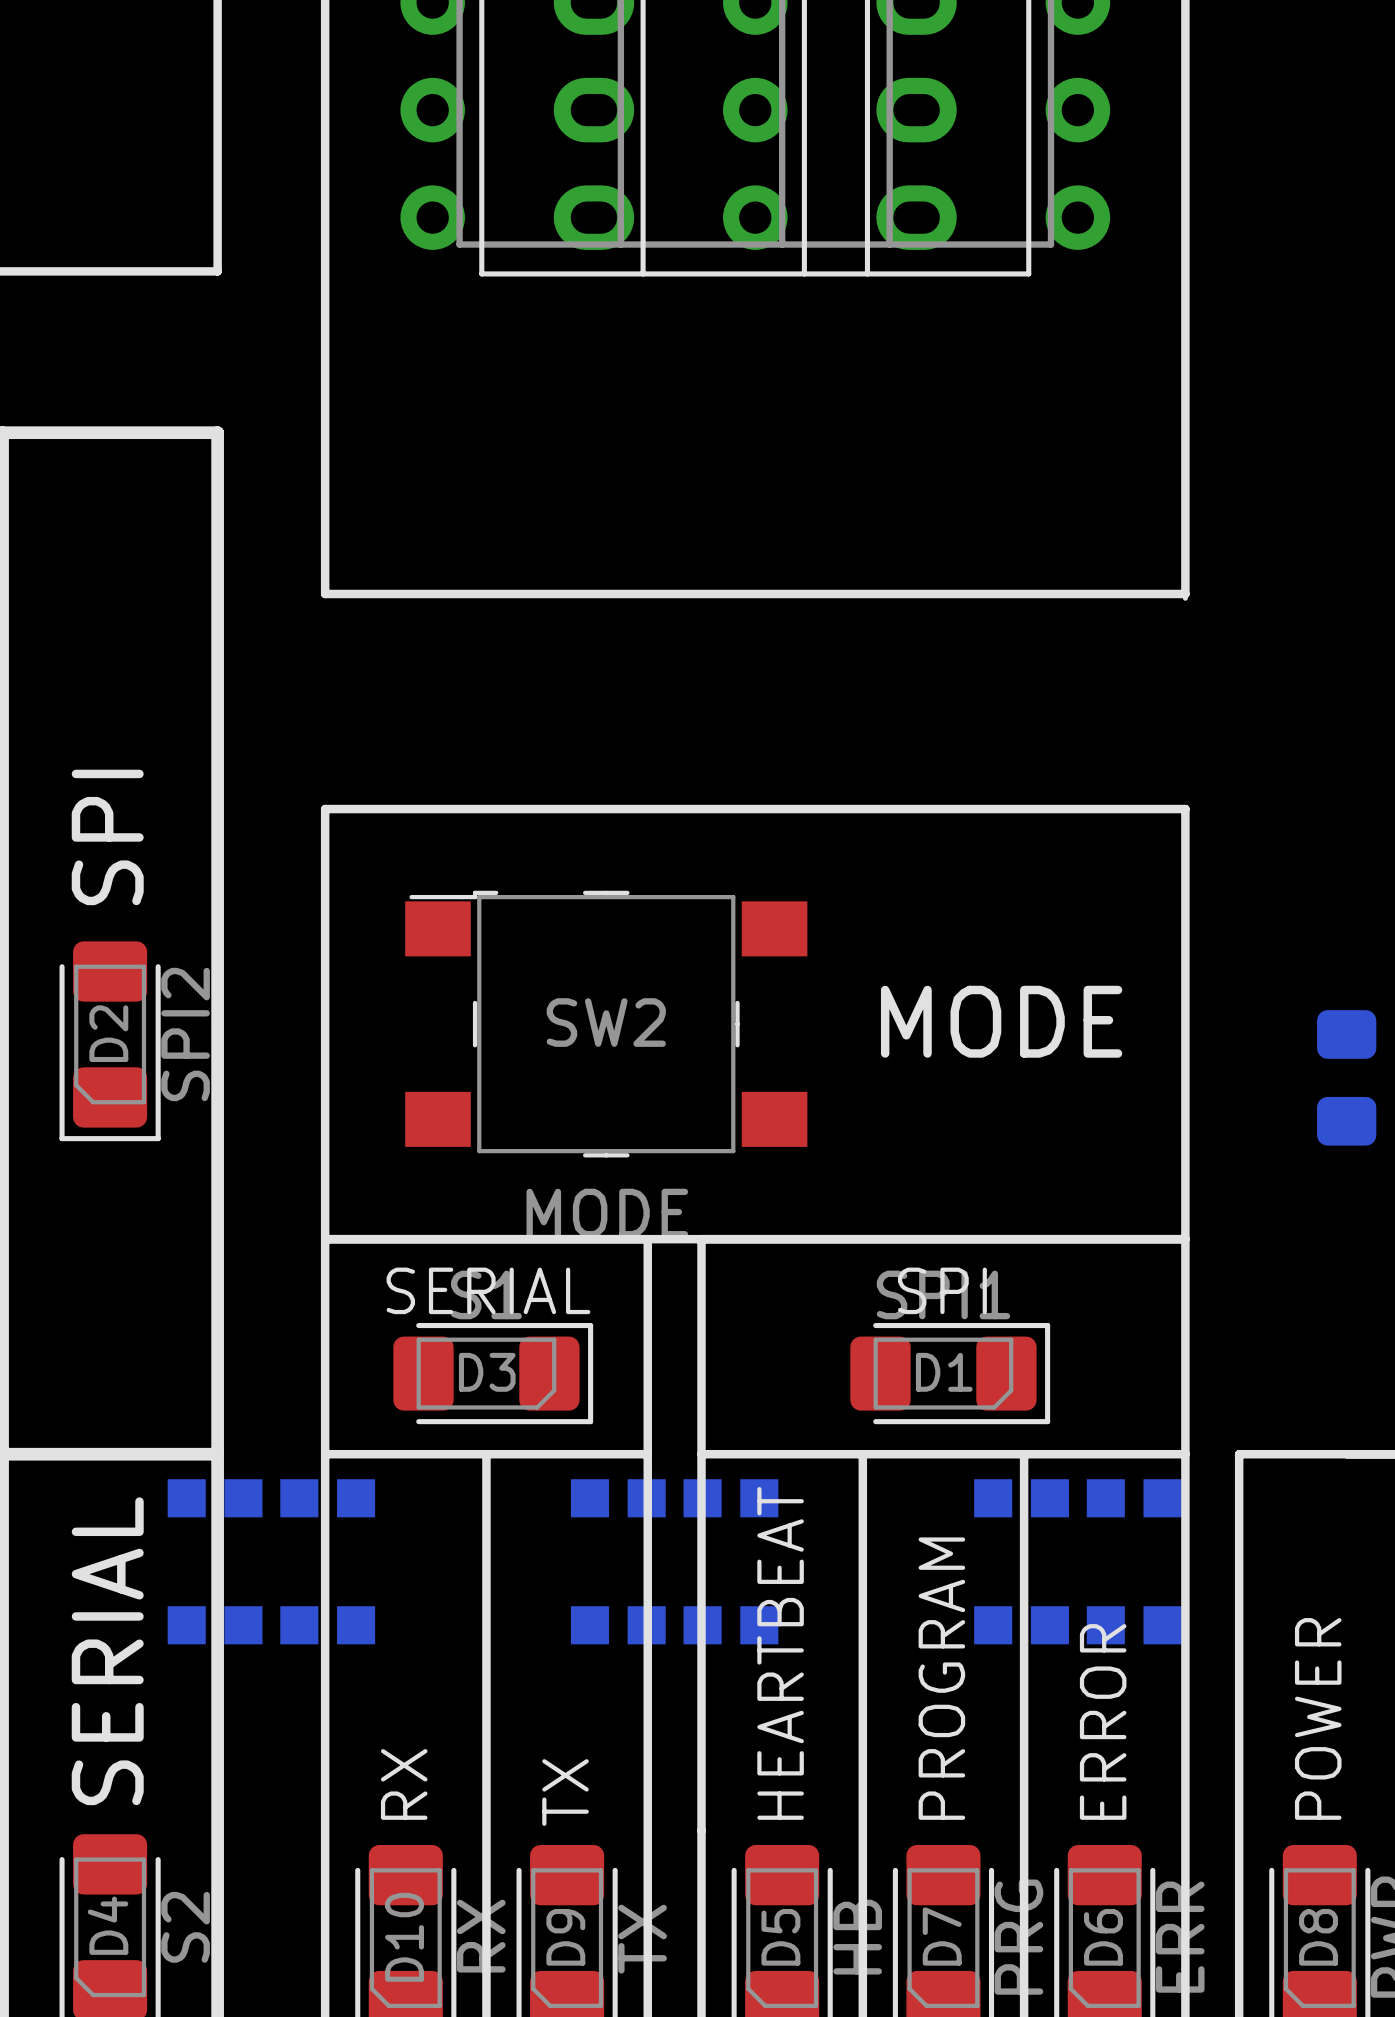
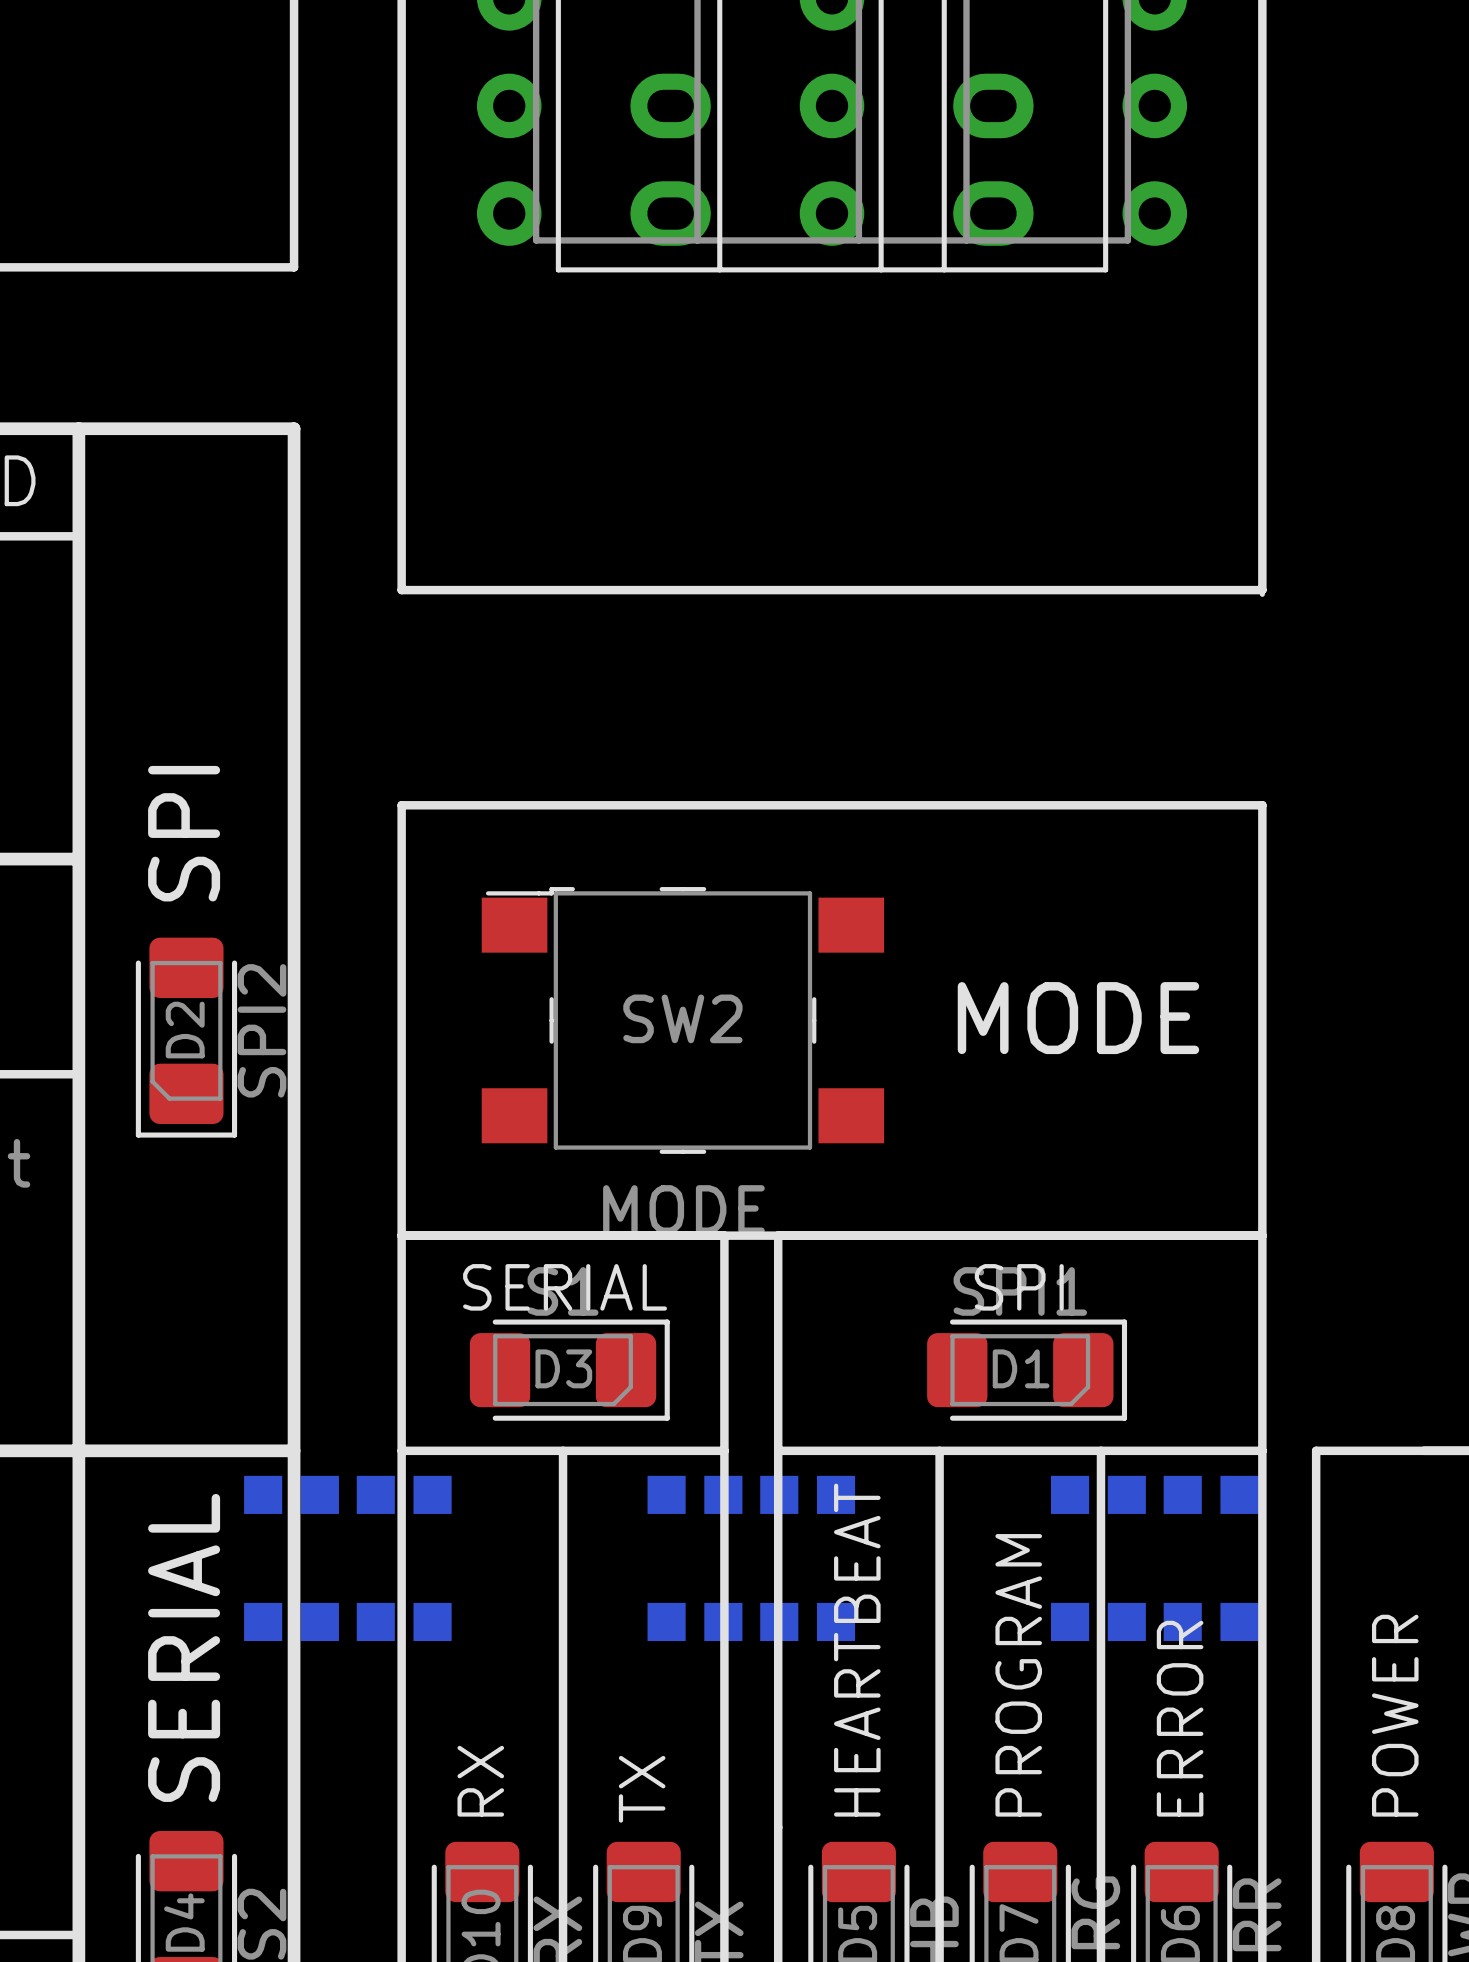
part: (1346, 1077) -> none

